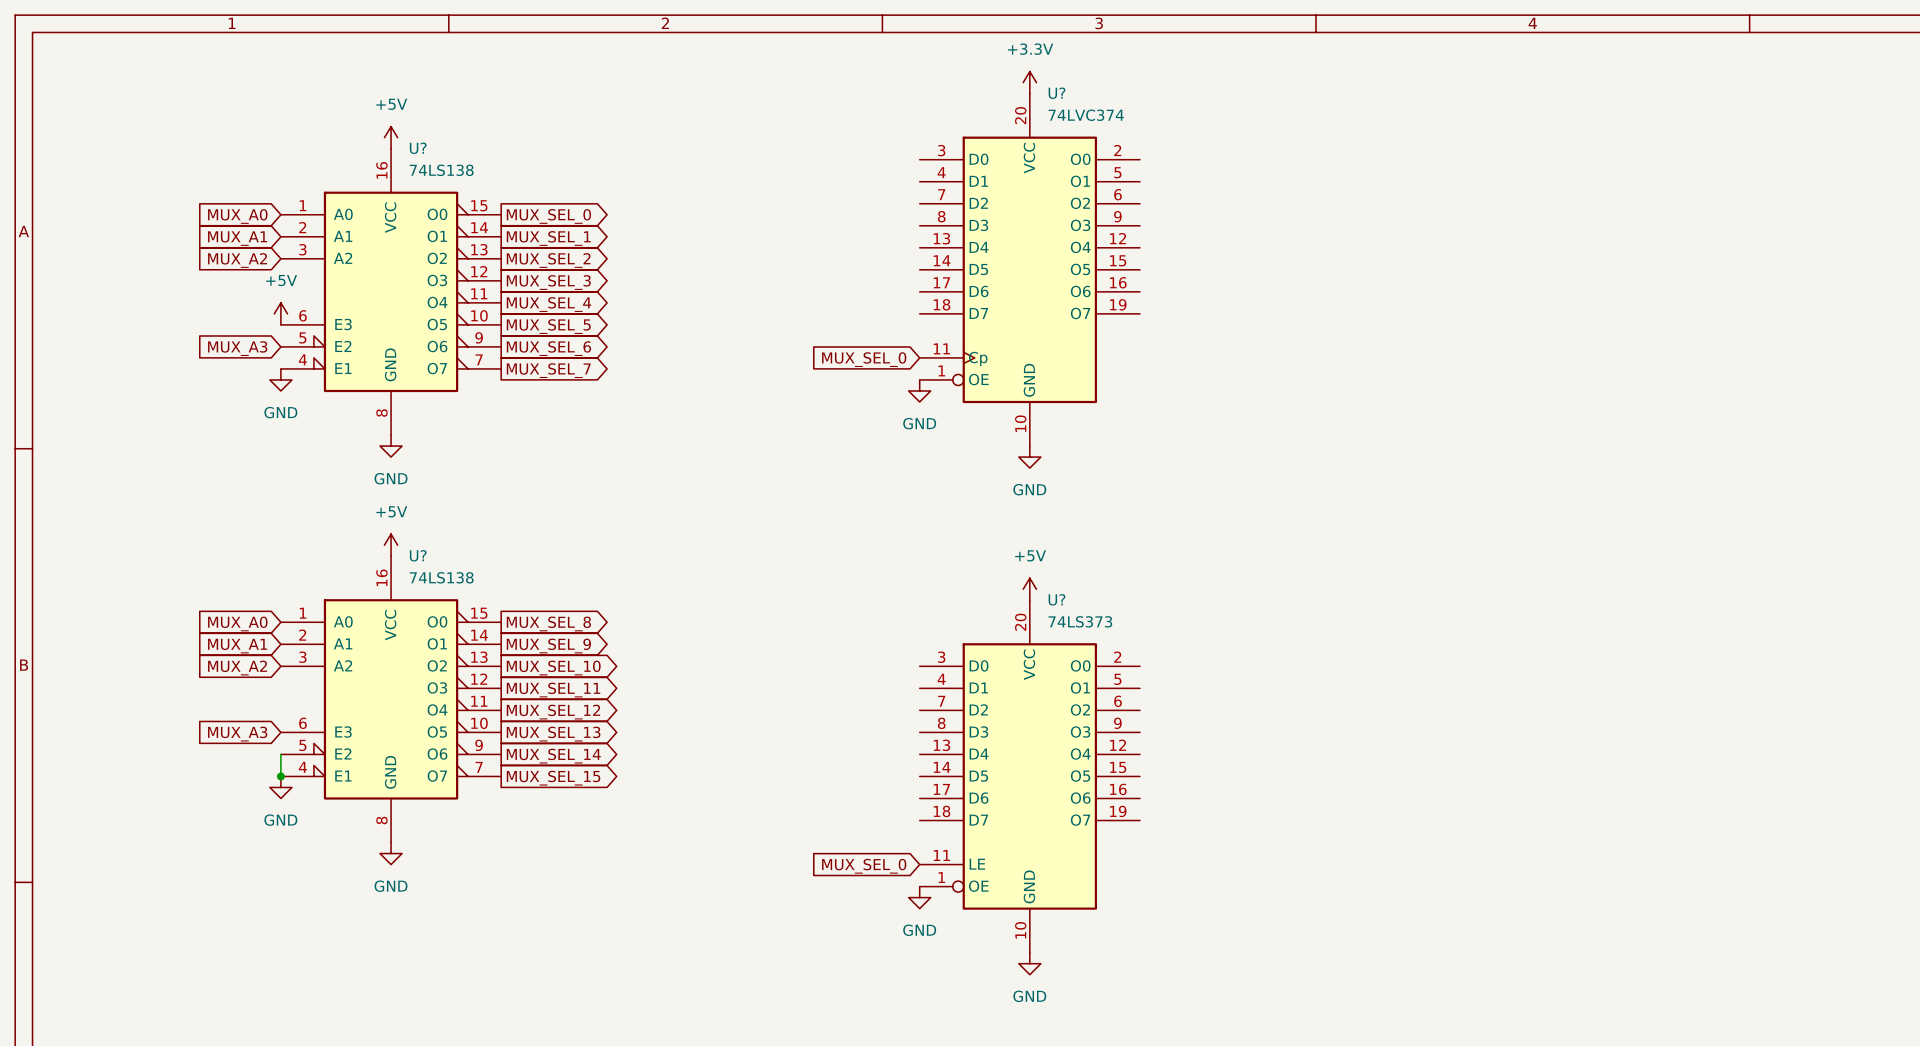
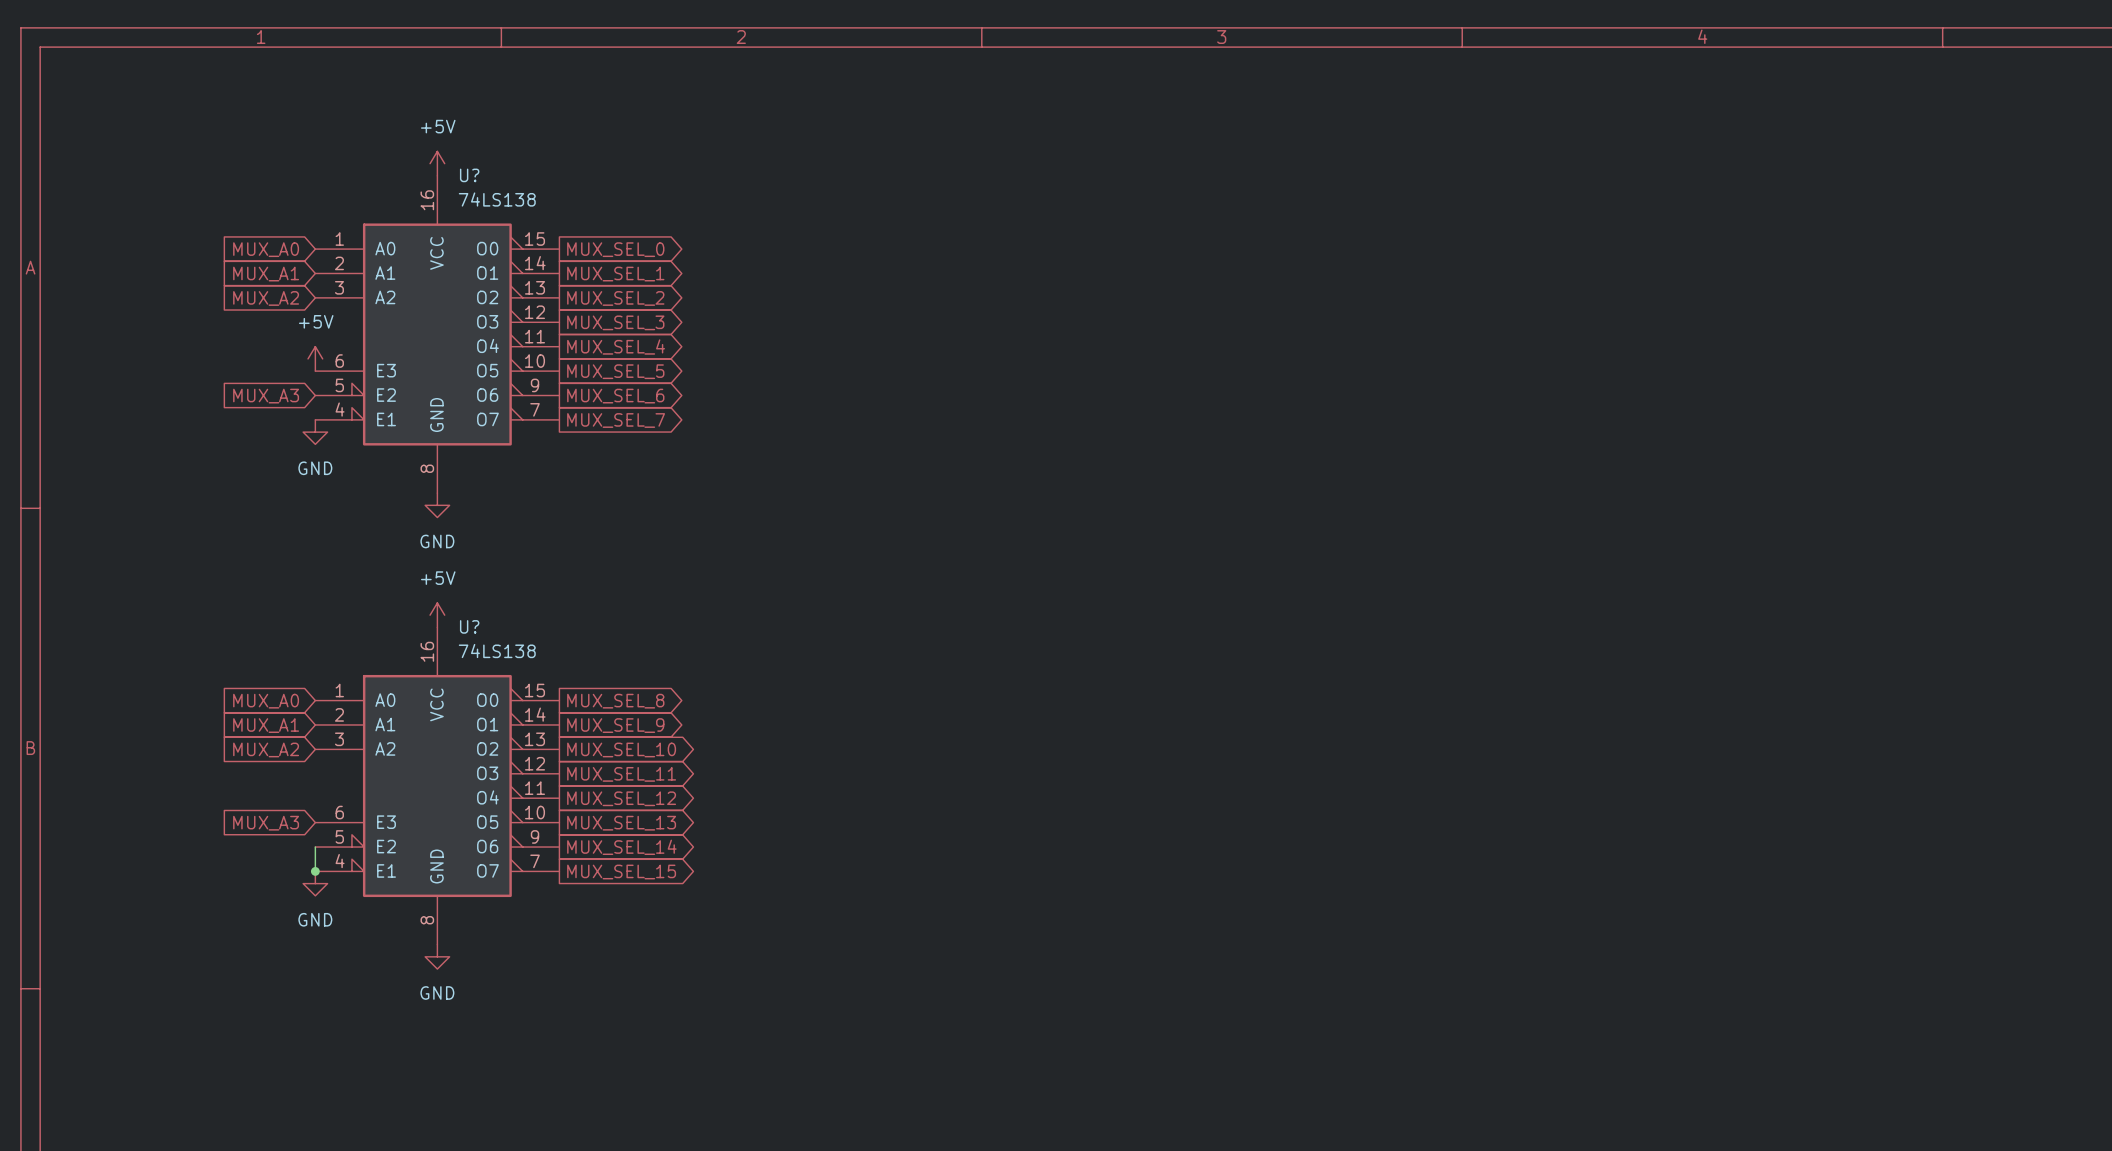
power symbol: +3.3V (1029, 82) -> none
U?: 74LVC374 (1029, 269) -> none
global label: MUX_SEL_0 (864, 359) -> none
power symbol: GND (919, 390) -> none
power symbol: GND (1029, 457) -> none
power symbol: +5V (1029, 589) -> none
U?: 74LS373 (1029, 776) -> none
global label: MUX_SEL_0 (864, 866) -> none
power symbol: GND (919, 897) -> none
power symbol: GND (1029, 963) -> none

